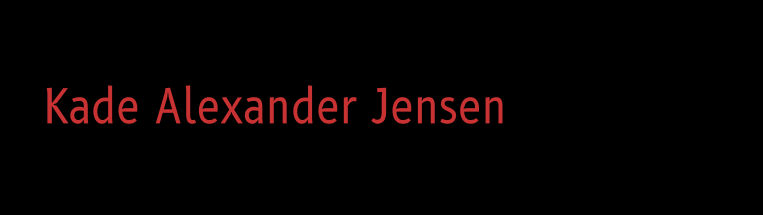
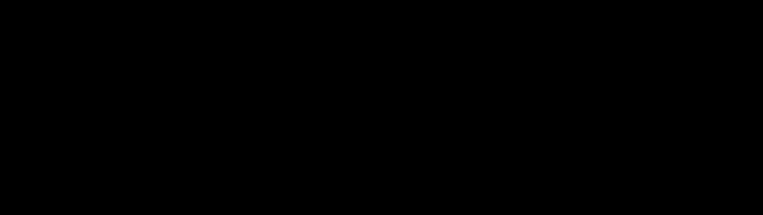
text: Kade Alexander Jensen (274, 104) -> none

